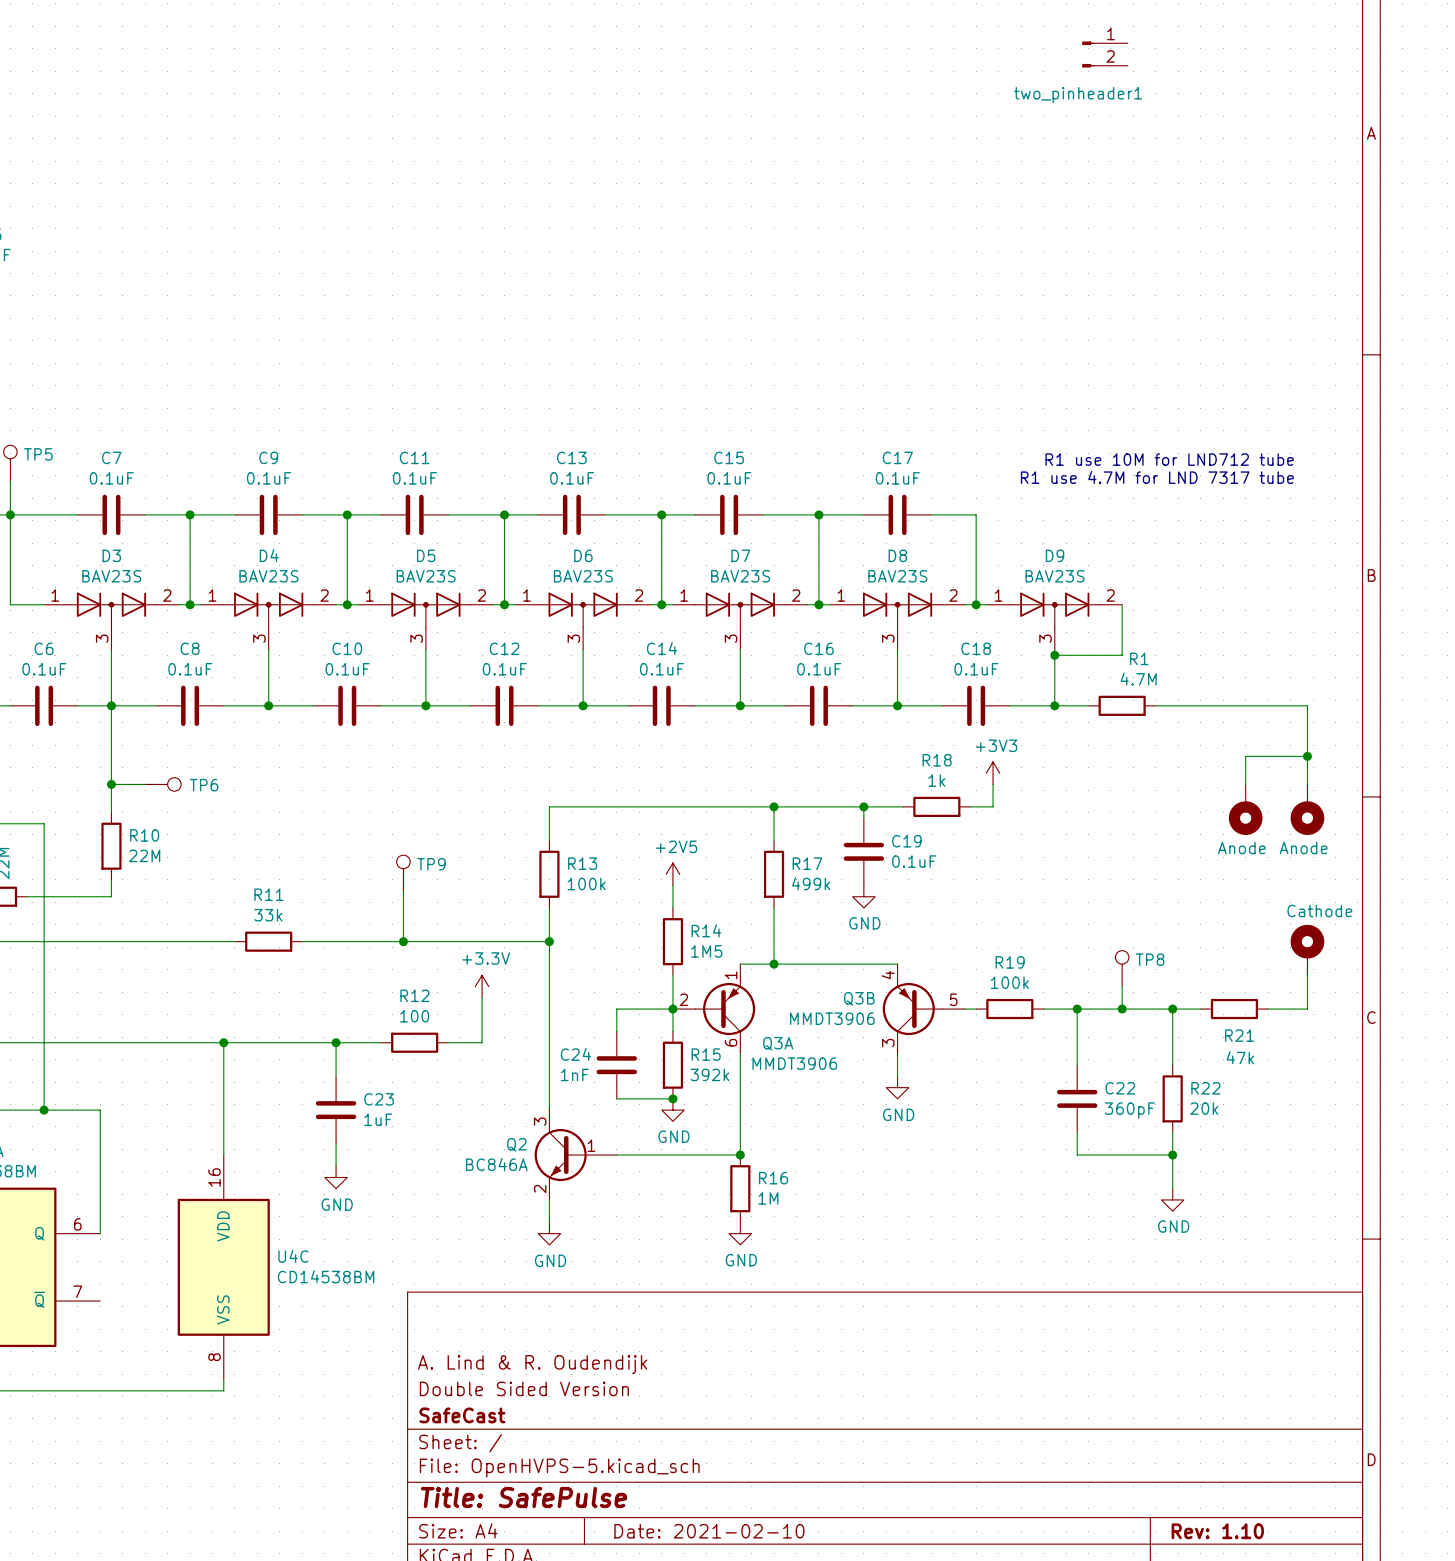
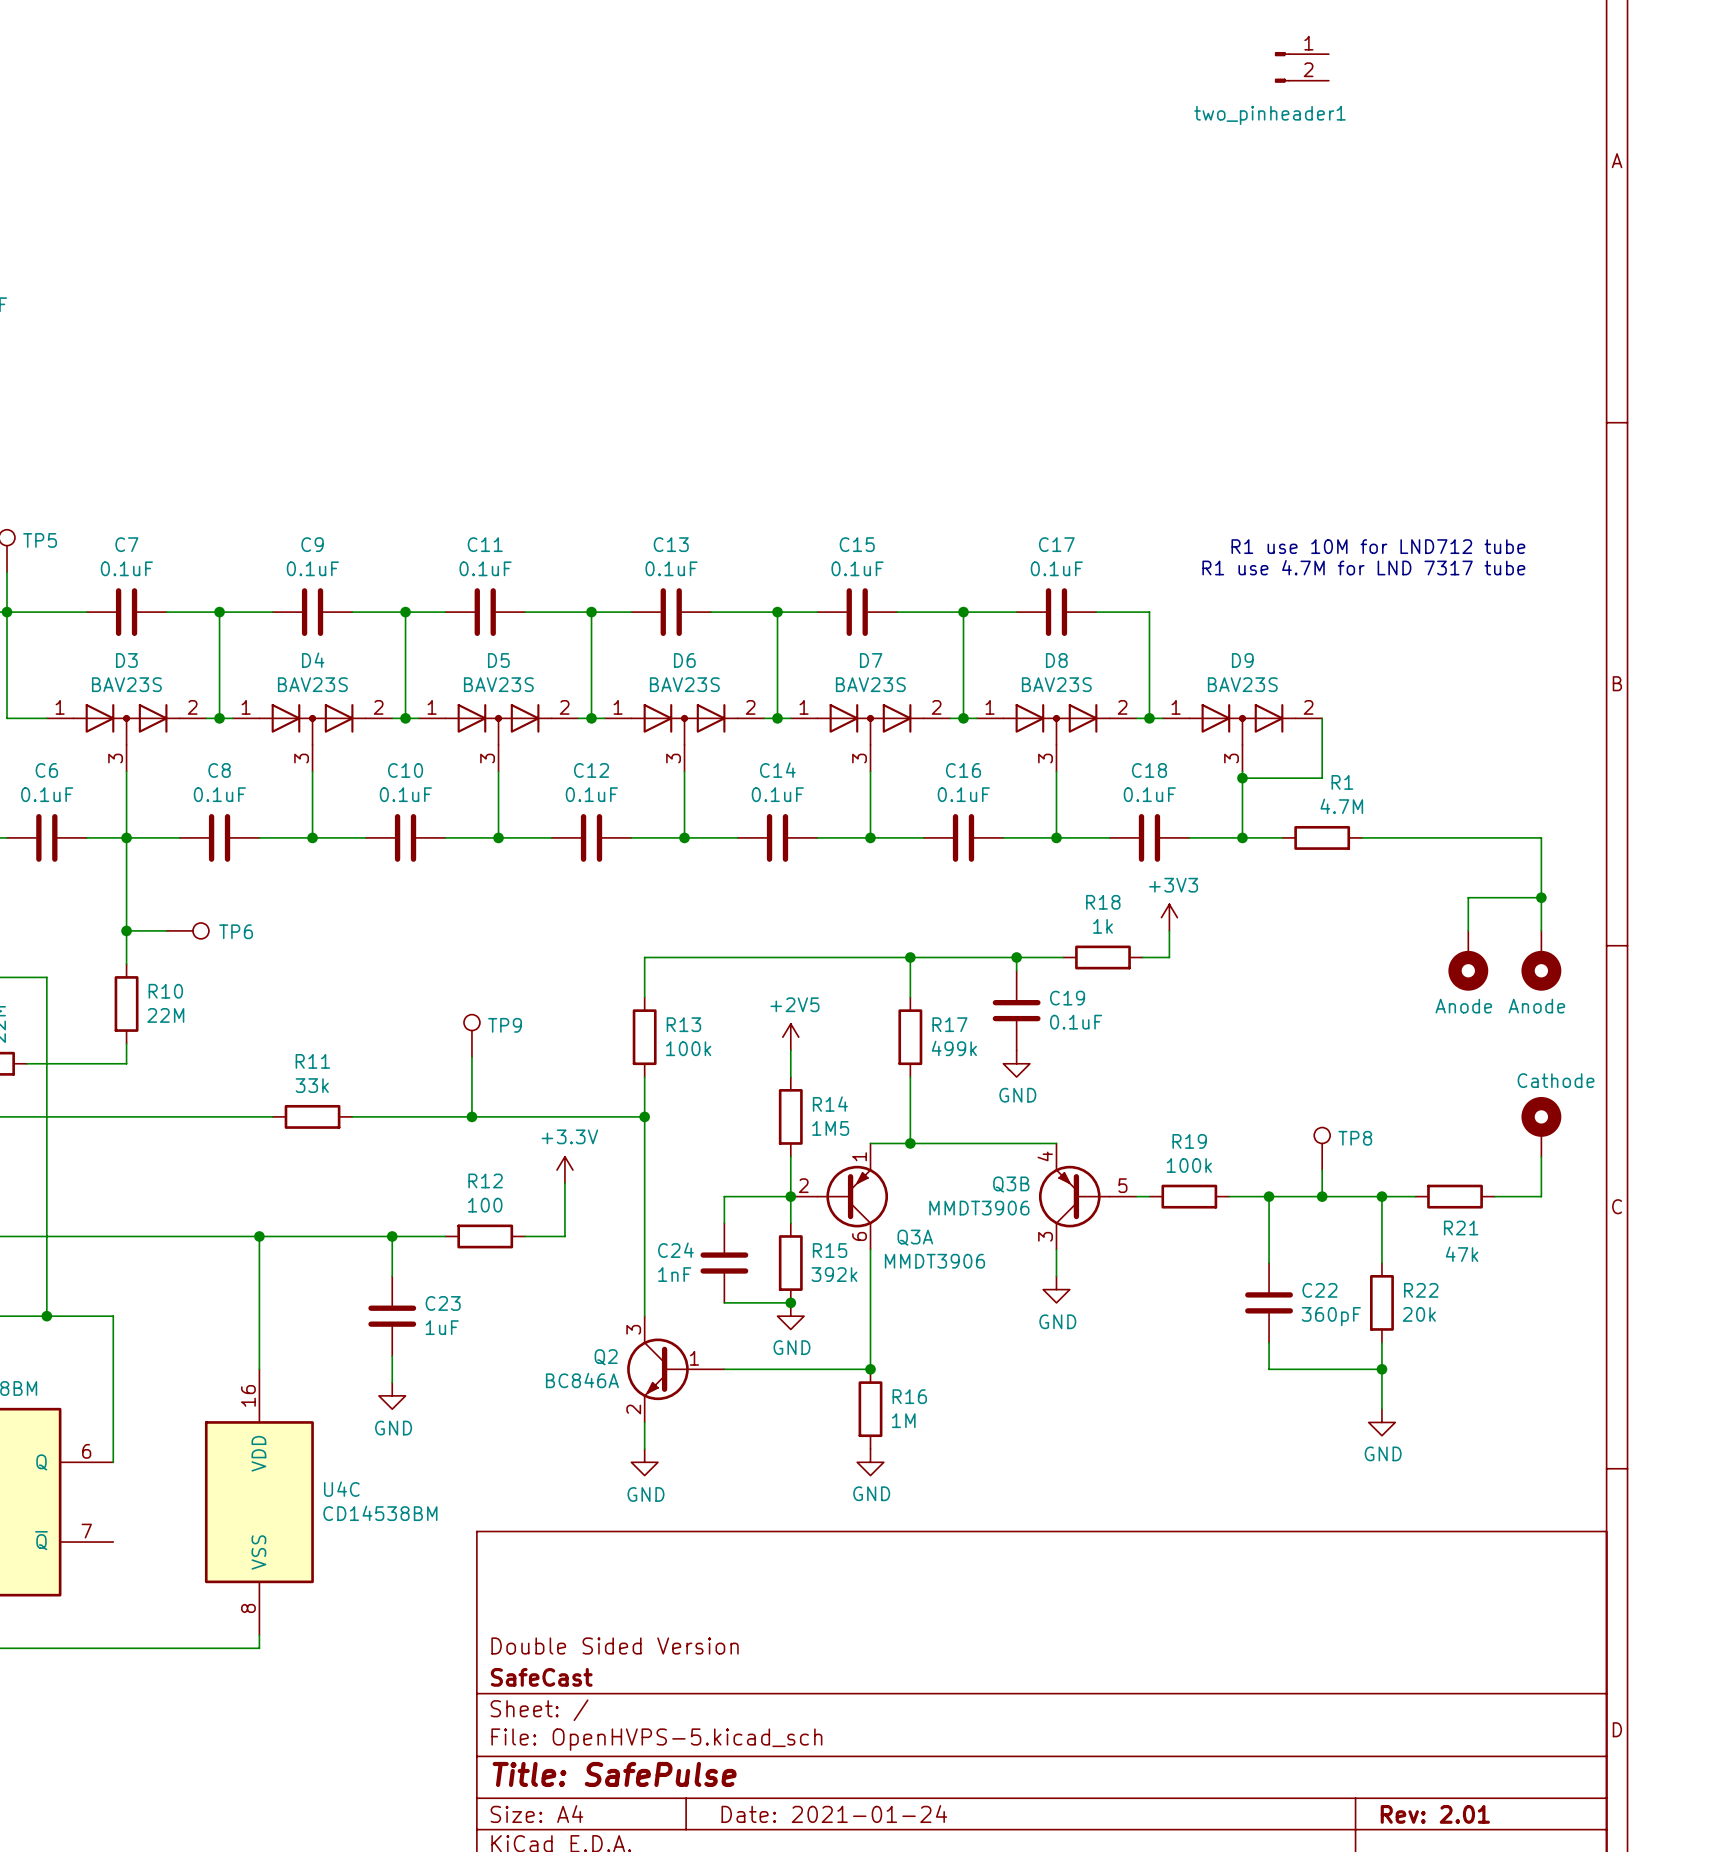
title block: A. Lind & R. Oudendijk (532, 1364) -> none
title block: Date: 2021-02-10 (709, 1531) -> Date: 2021-01-24 (834, 1814)
title block: Rev: 1.10 (1217, 1531) -> Rev: 2.01 (1435, 1814)

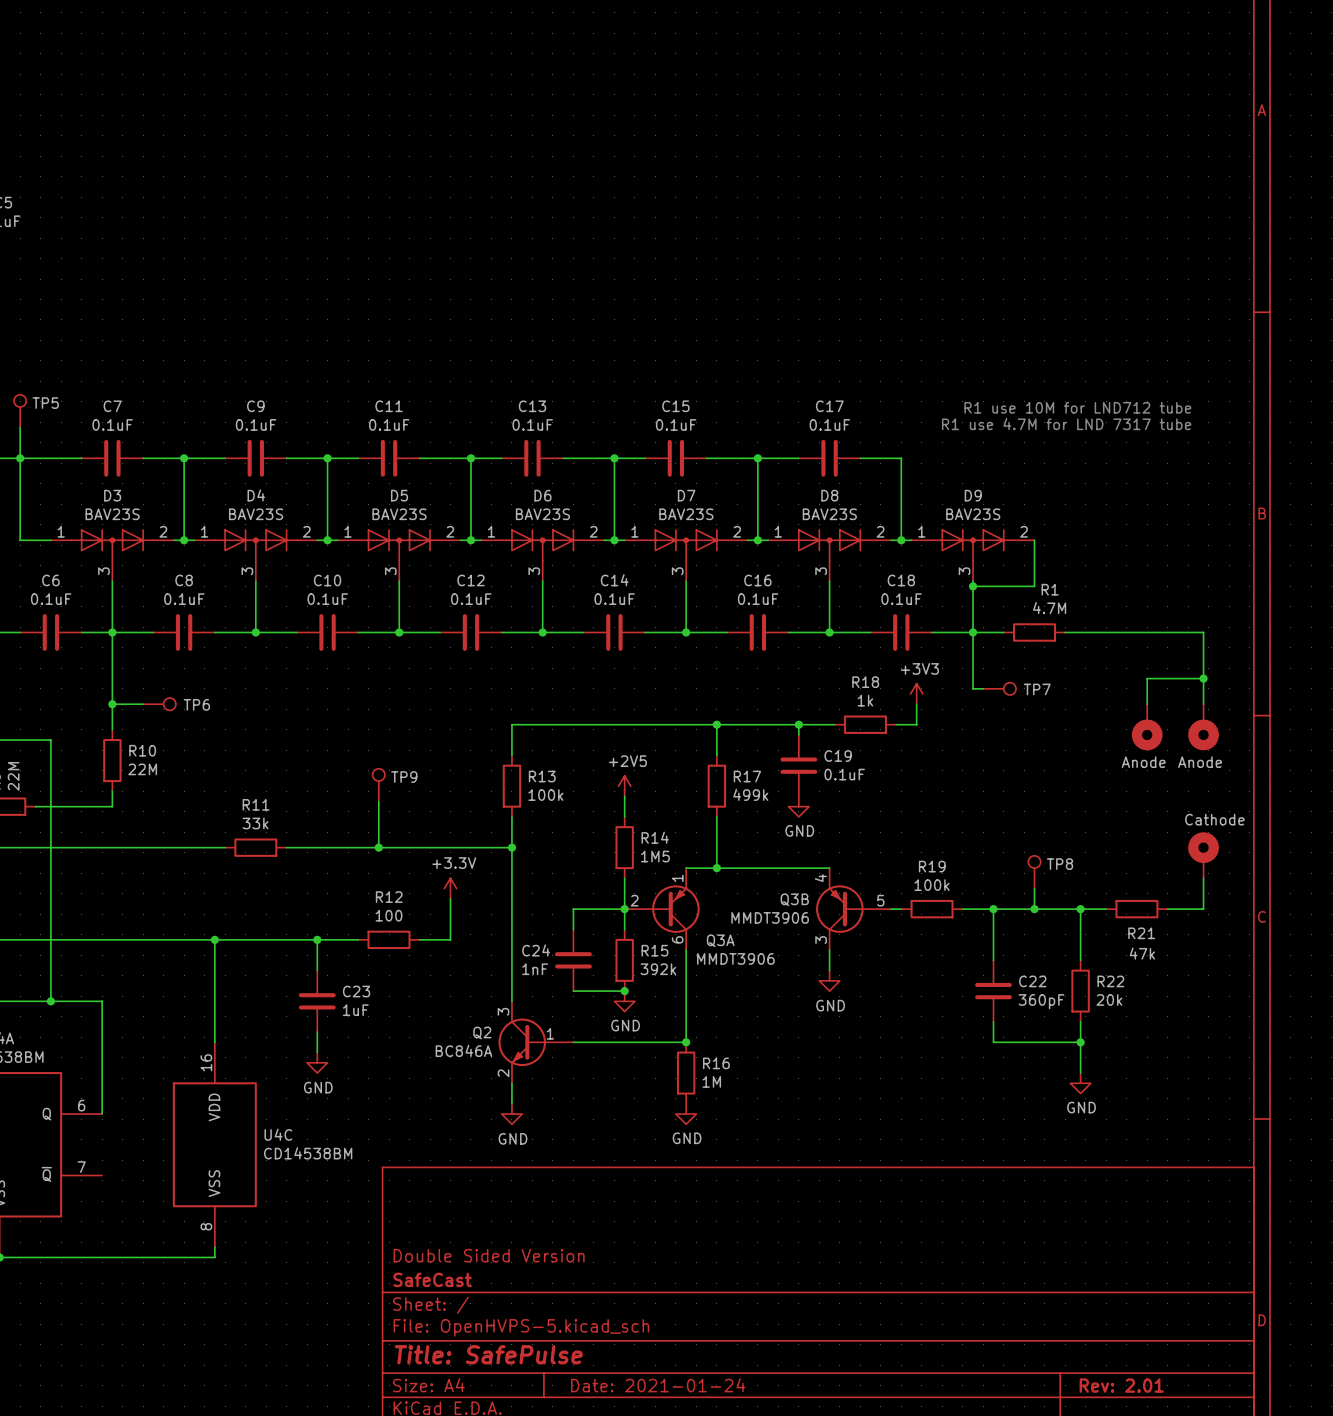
two_pinheader1: (1301, 67) -> none
wire: none -> (973, 632) (973, 688) (983, 688)
TP7: none -> (999, 688)

